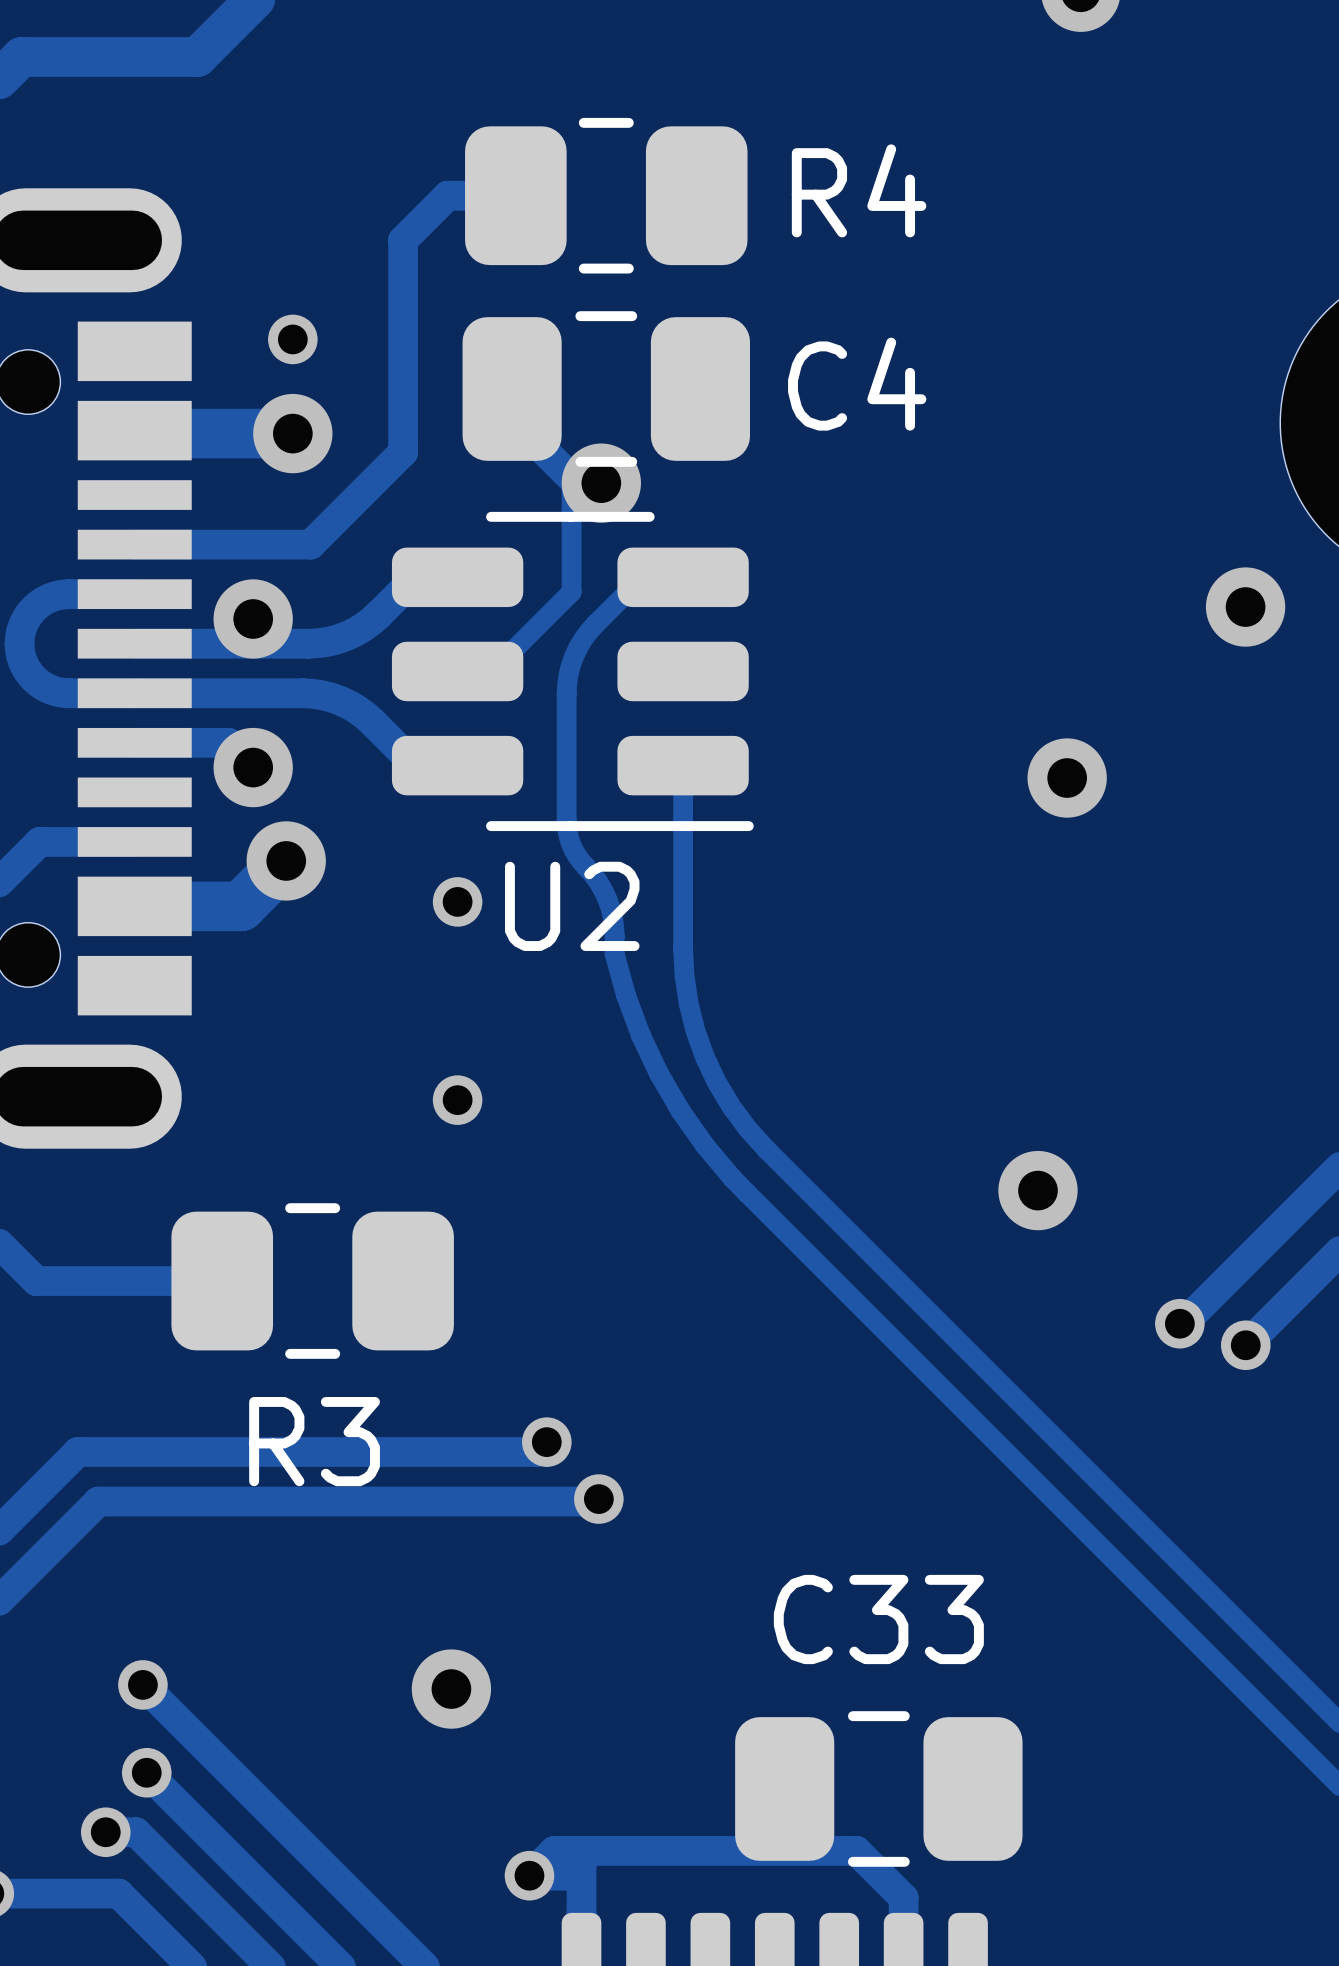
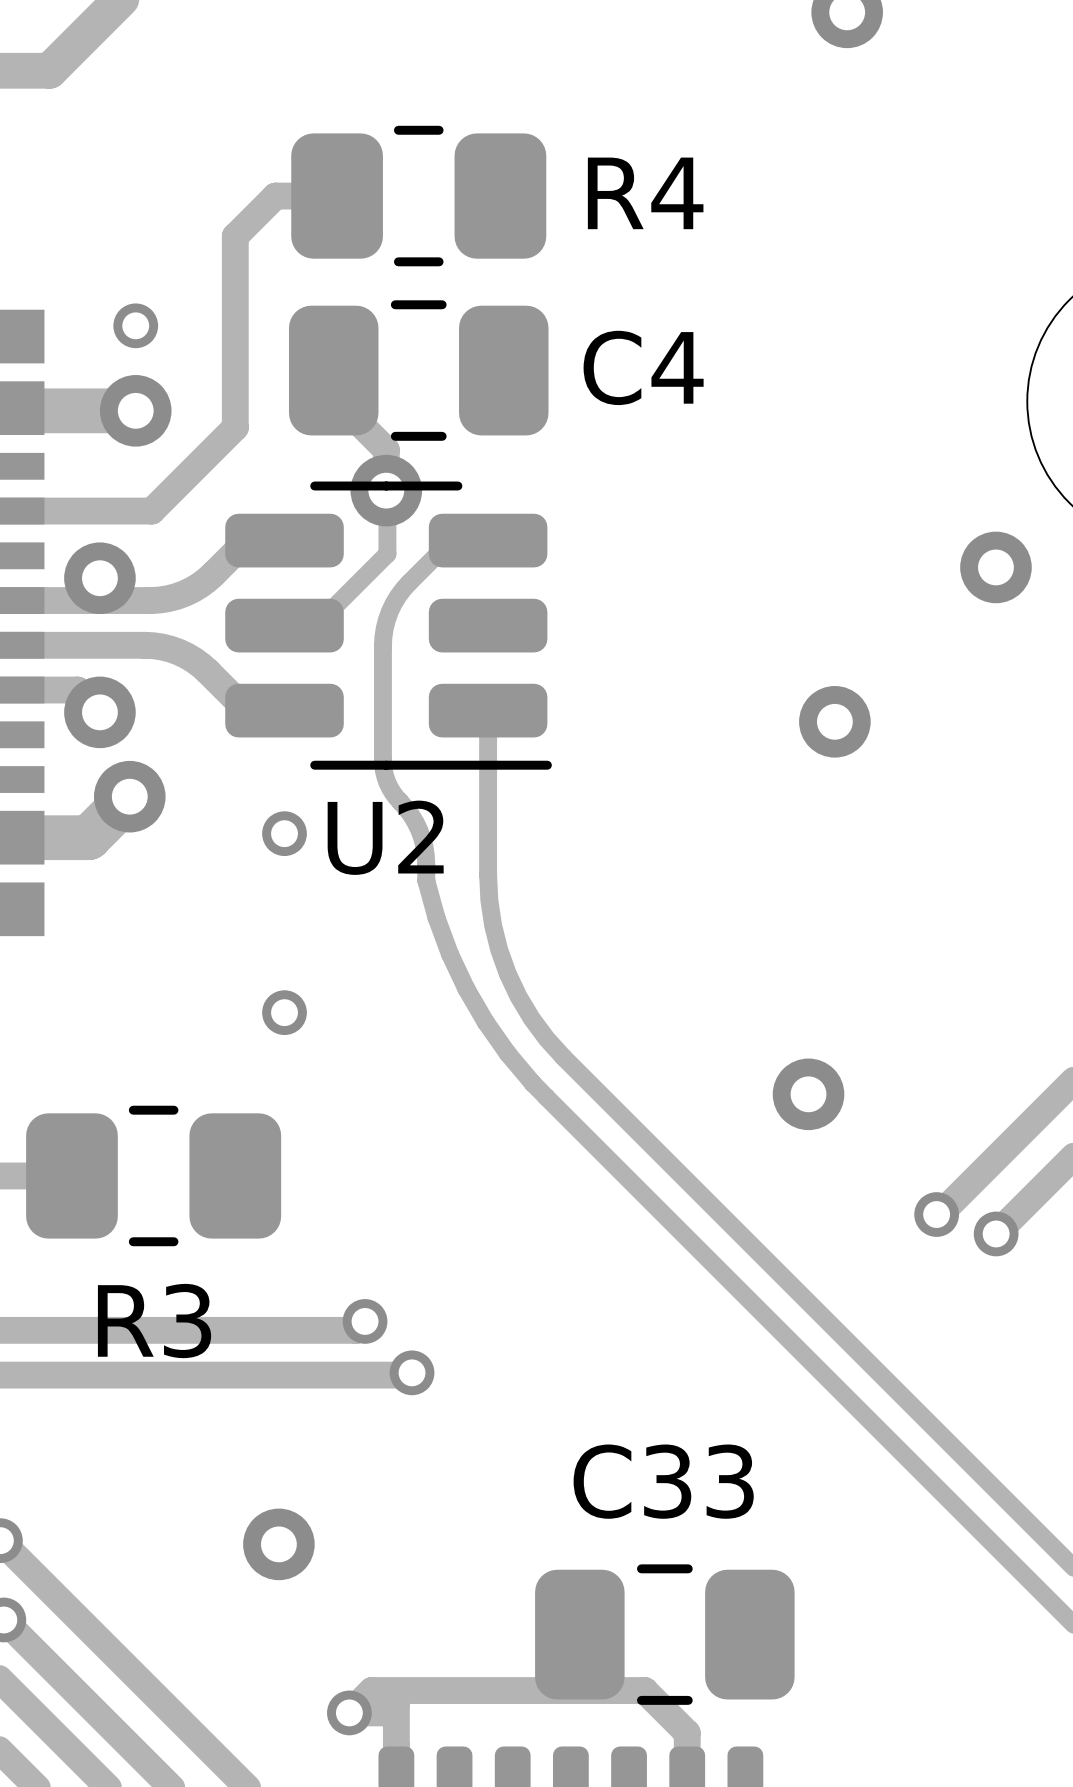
via position: (601, 483) -> (386, 490)

